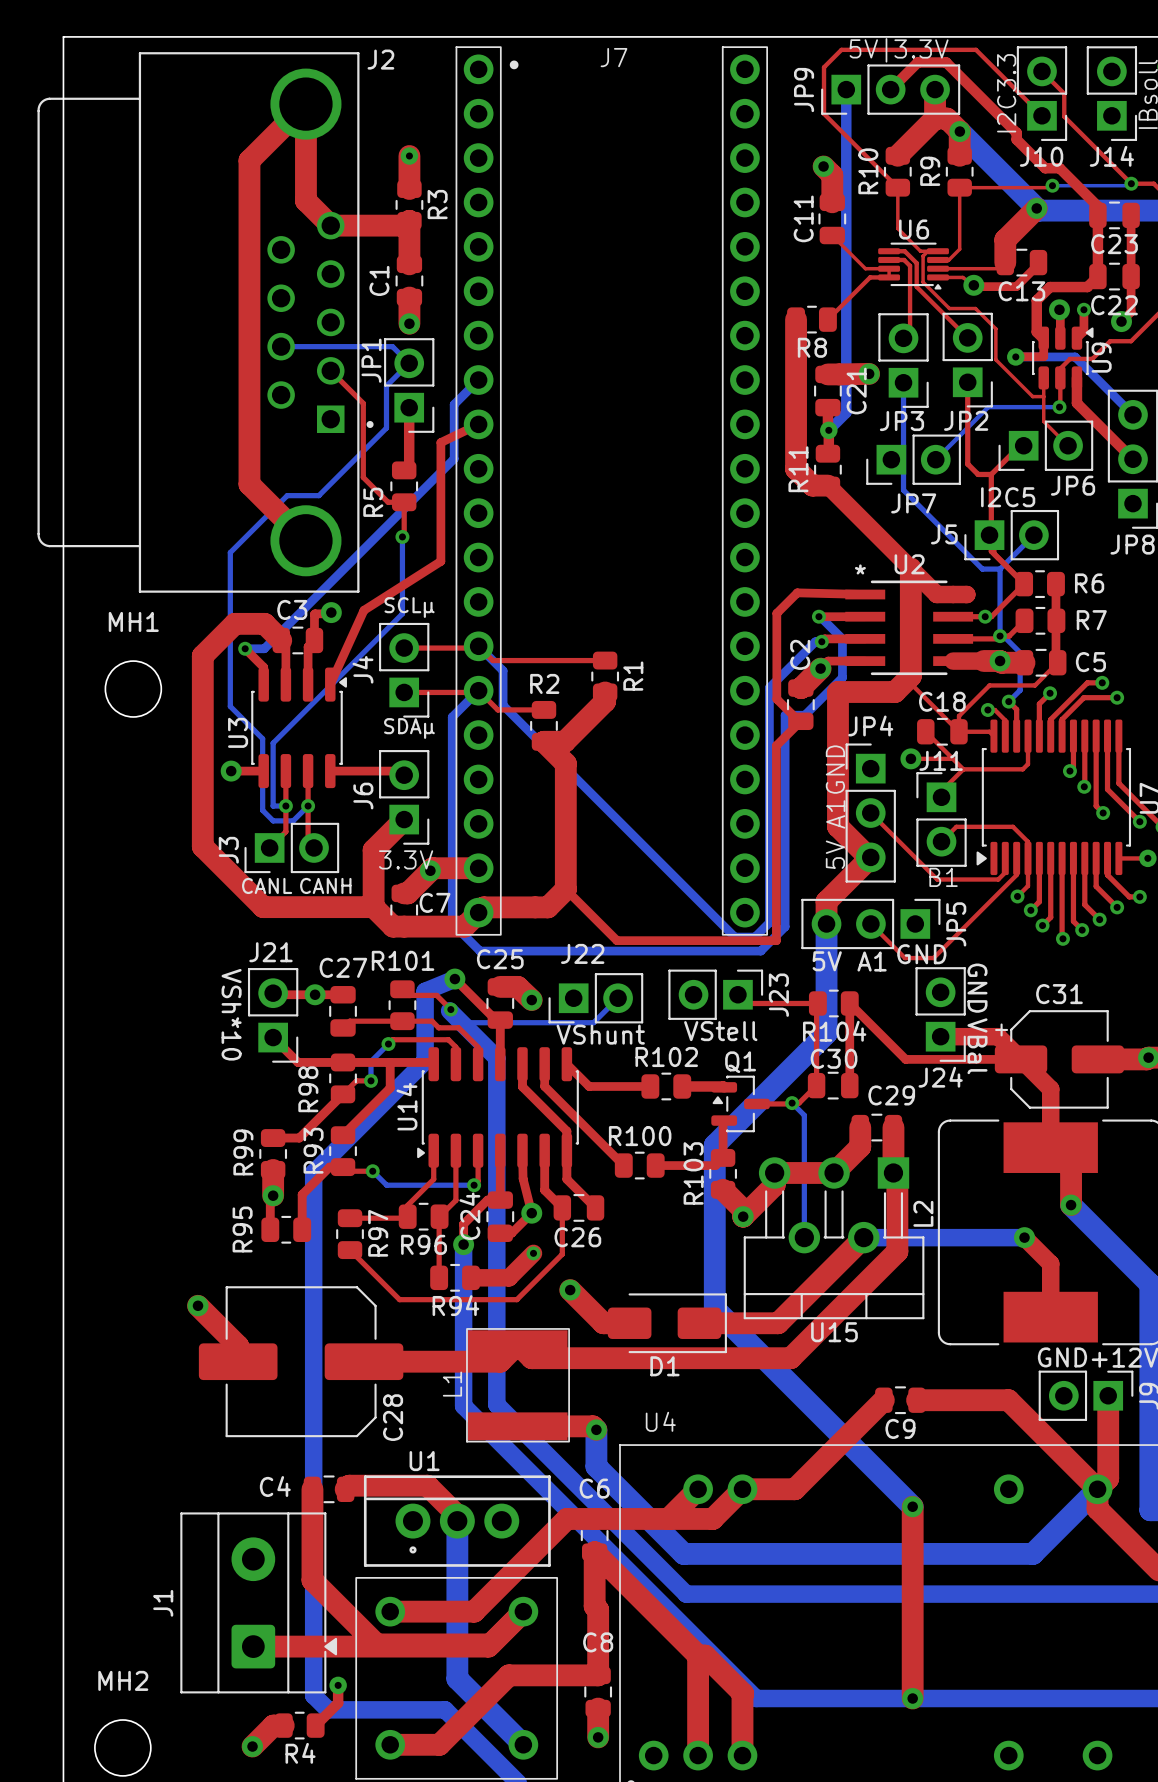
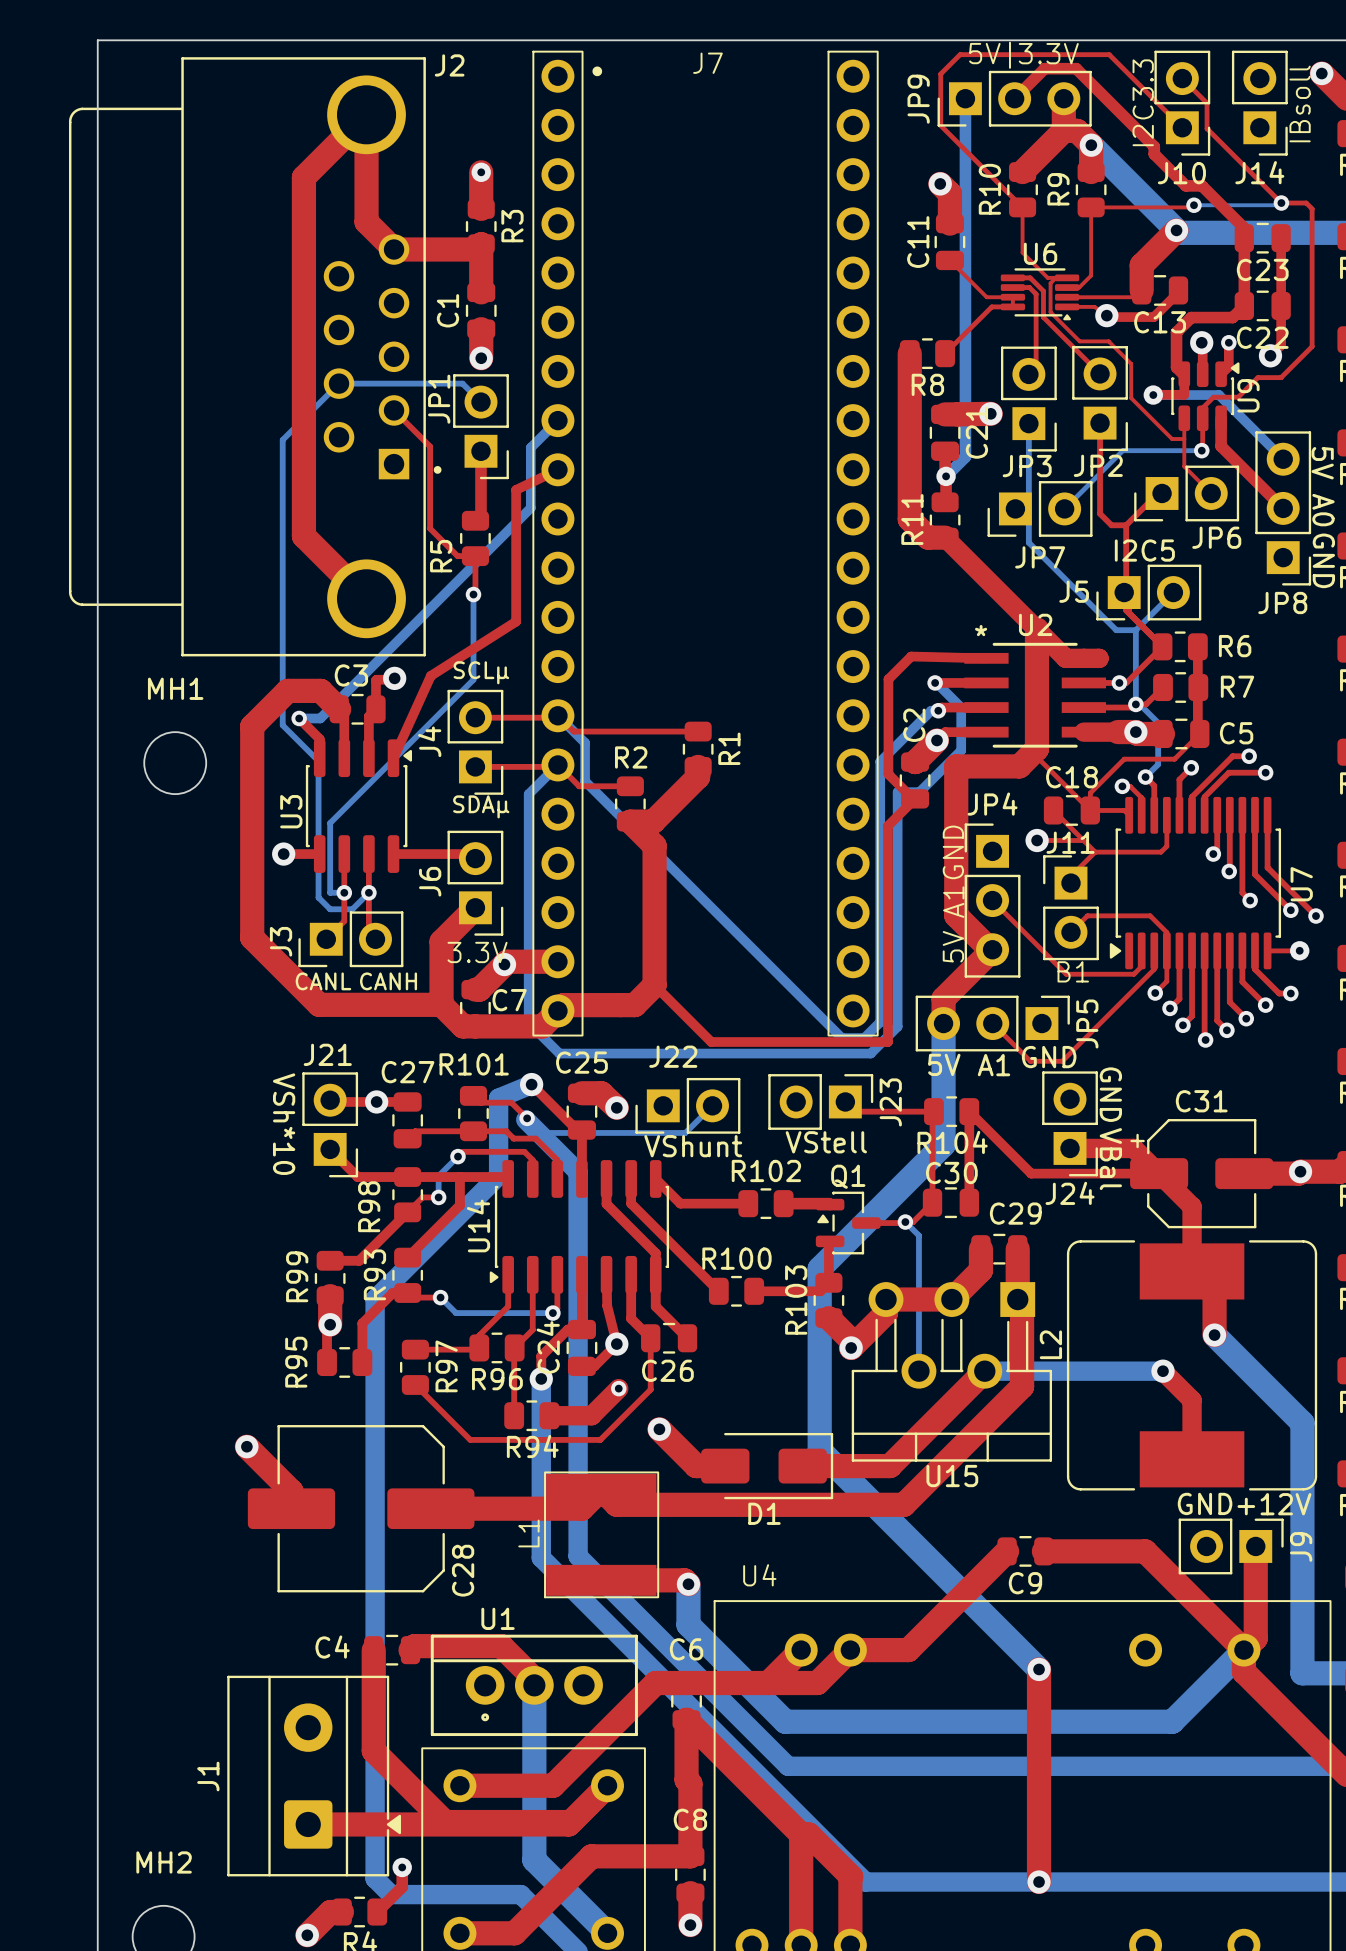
bottom track: (409, 363) (386, 386) (386, 428) (318, 495) (287, 495) (230, 552) -> (339, 383) (282, 439) (282, 611)
bottom track: (230, 654) (230, 706) (262, 738) -> (282, 725) (318, 761) (318, 818)

